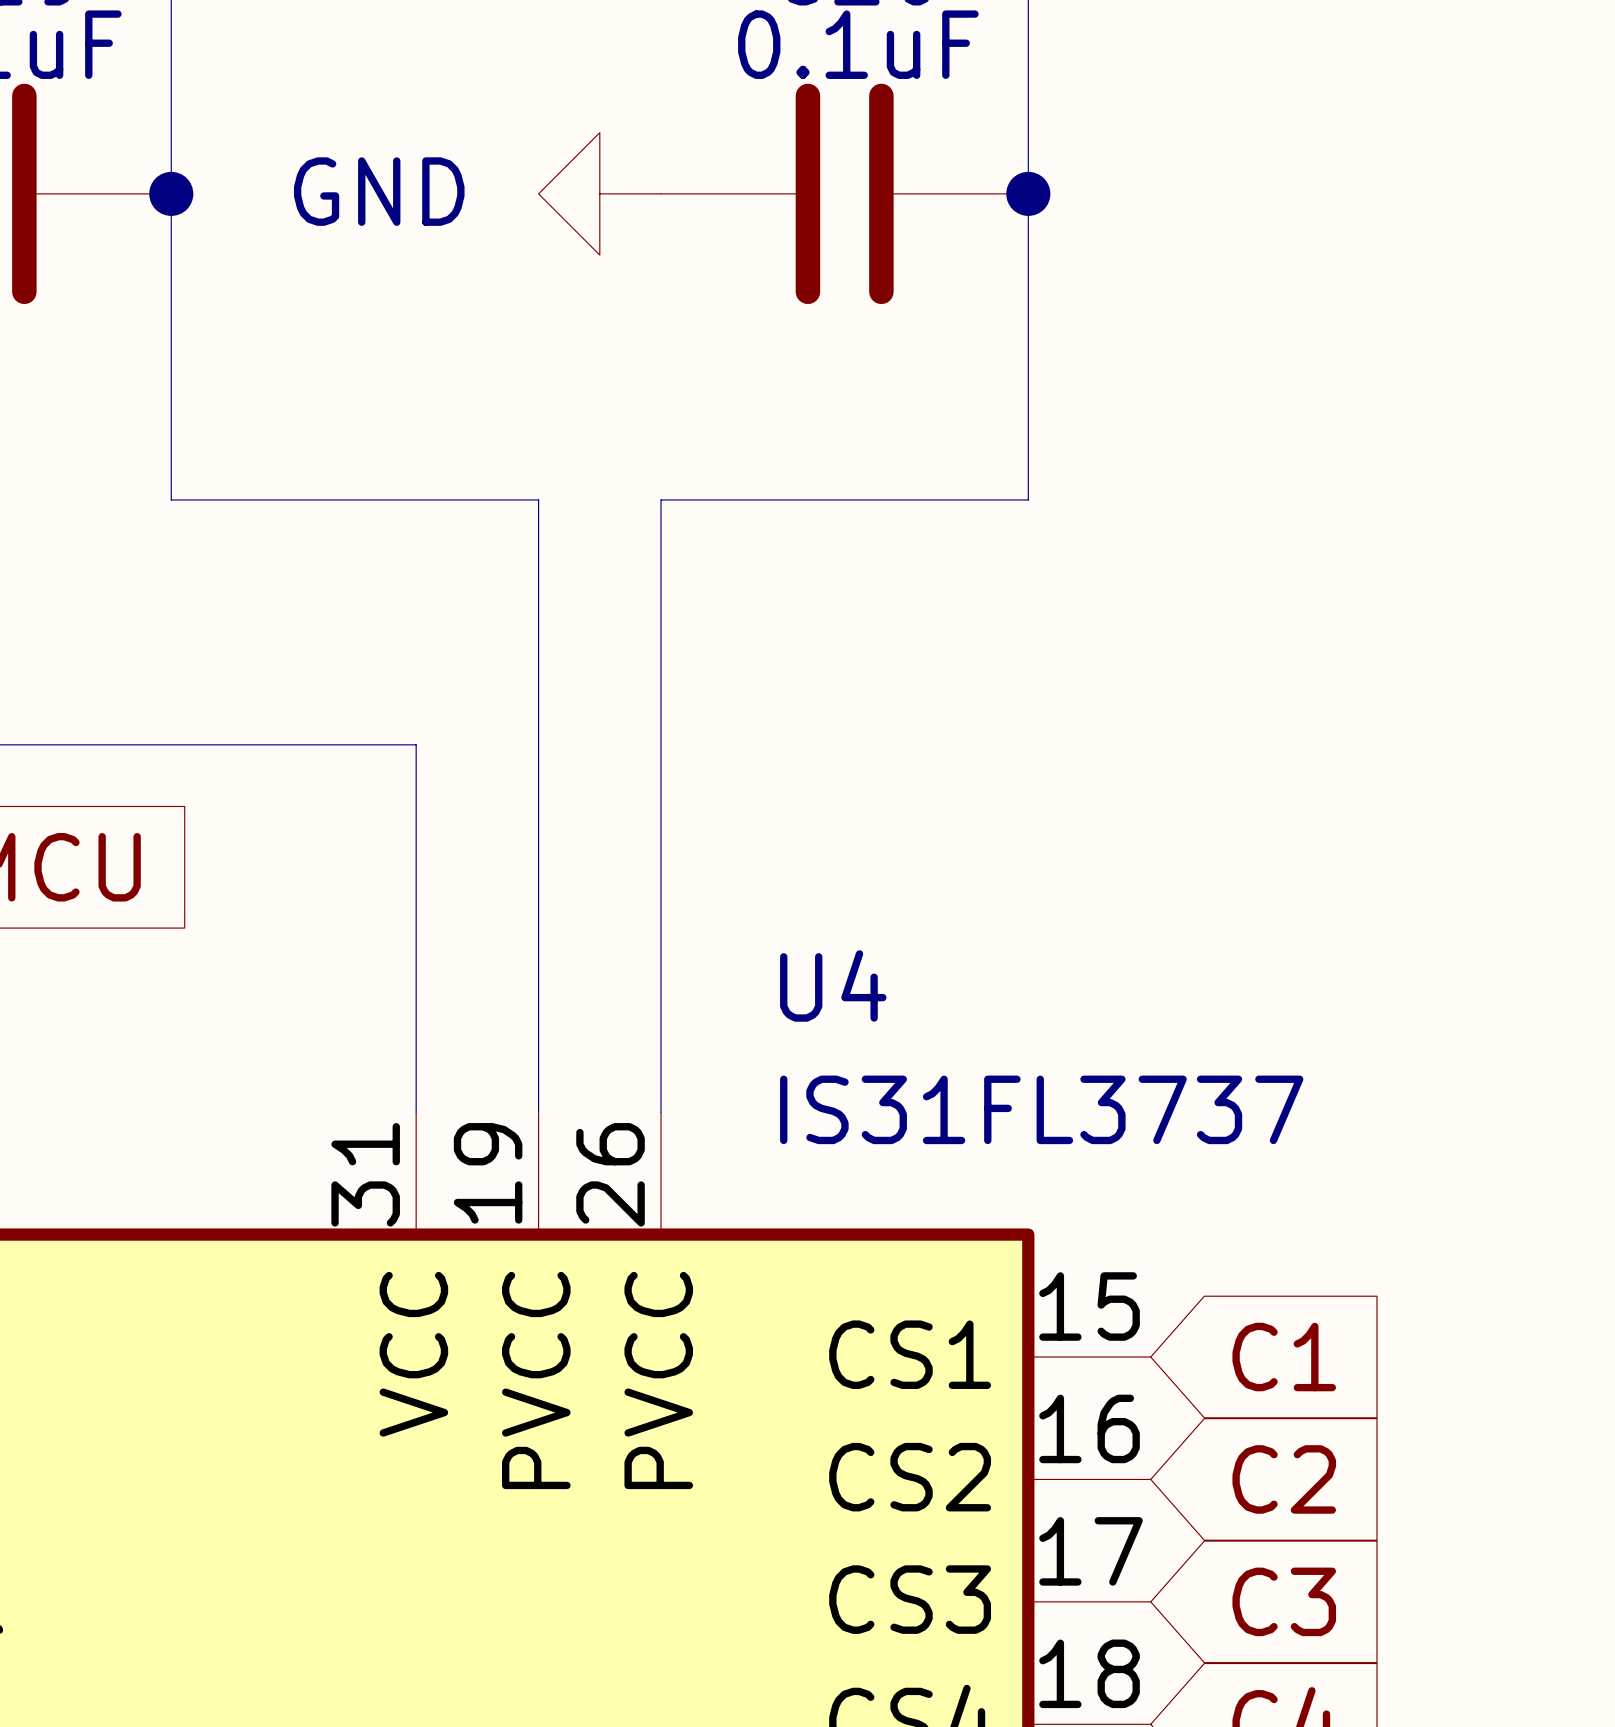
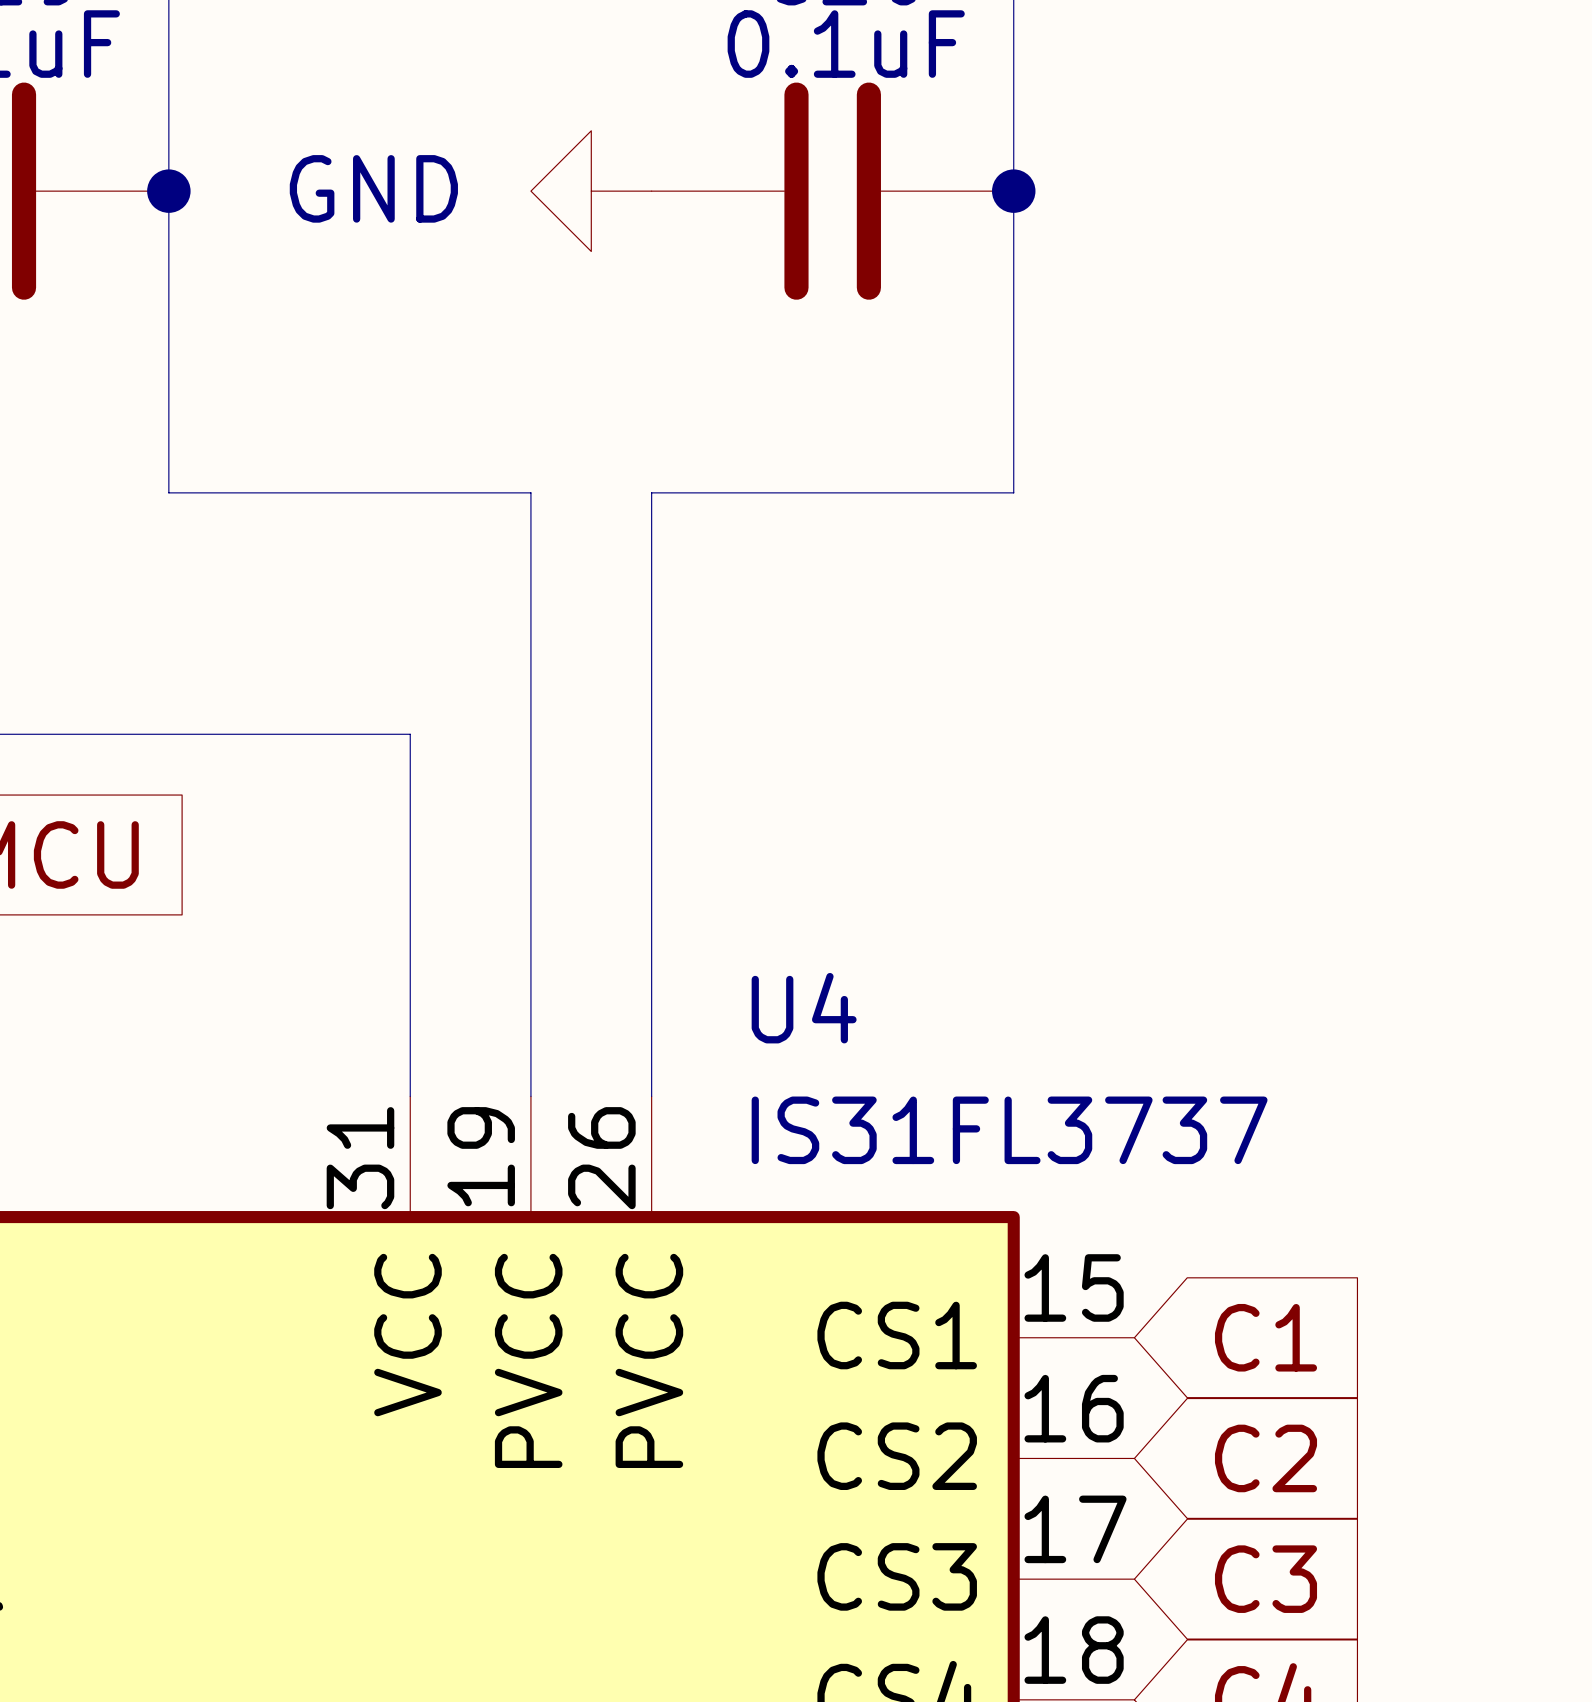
U4 name position: U4 (833, 985) -> U4 (804, 1008)
U4 value position: IS31FL3737 (1041, 1109) -> IS31FL3737 (1009, 1130)

